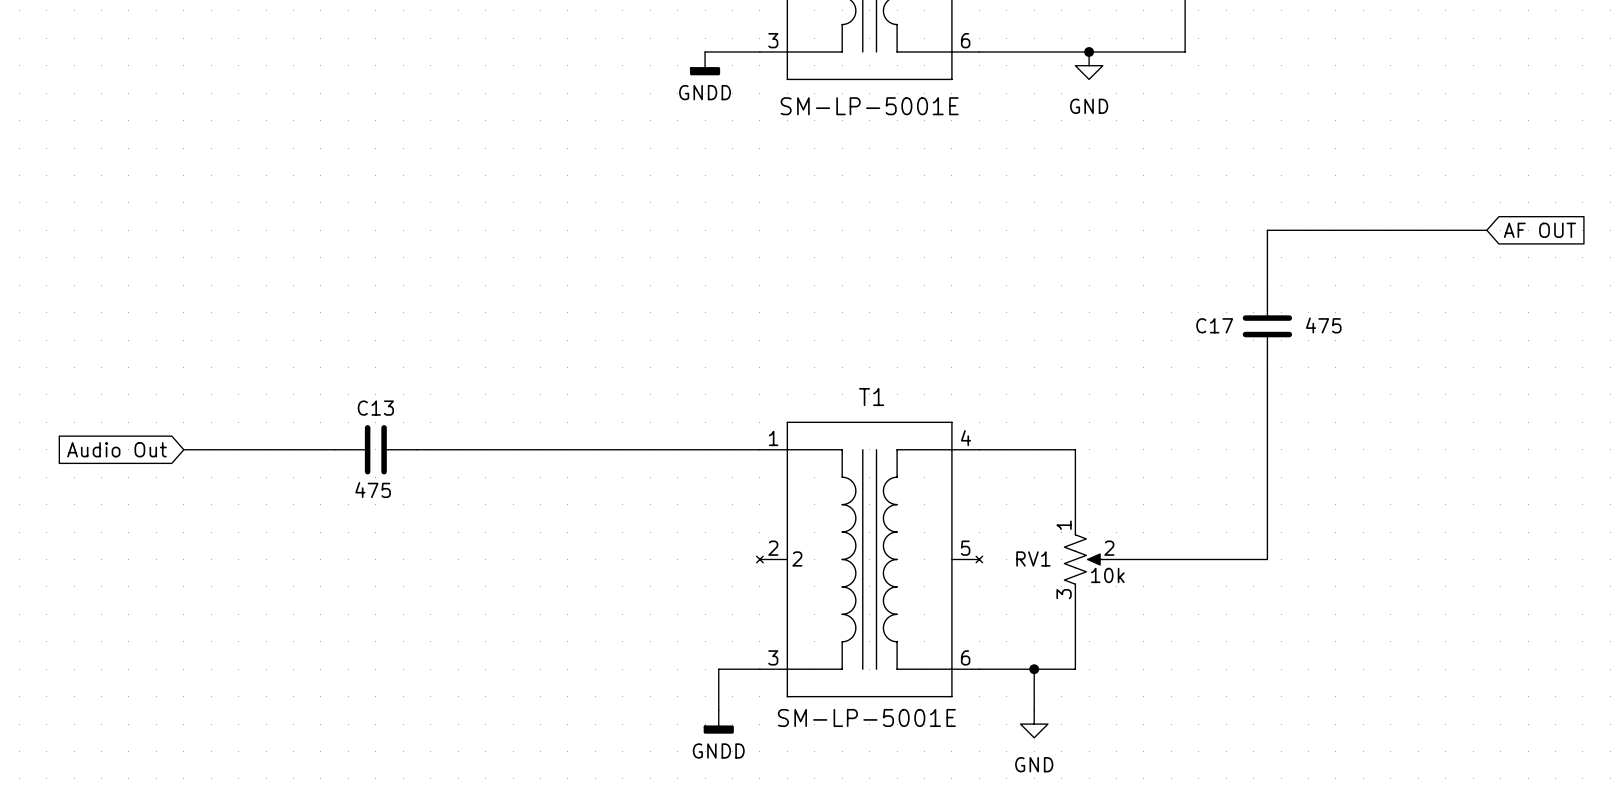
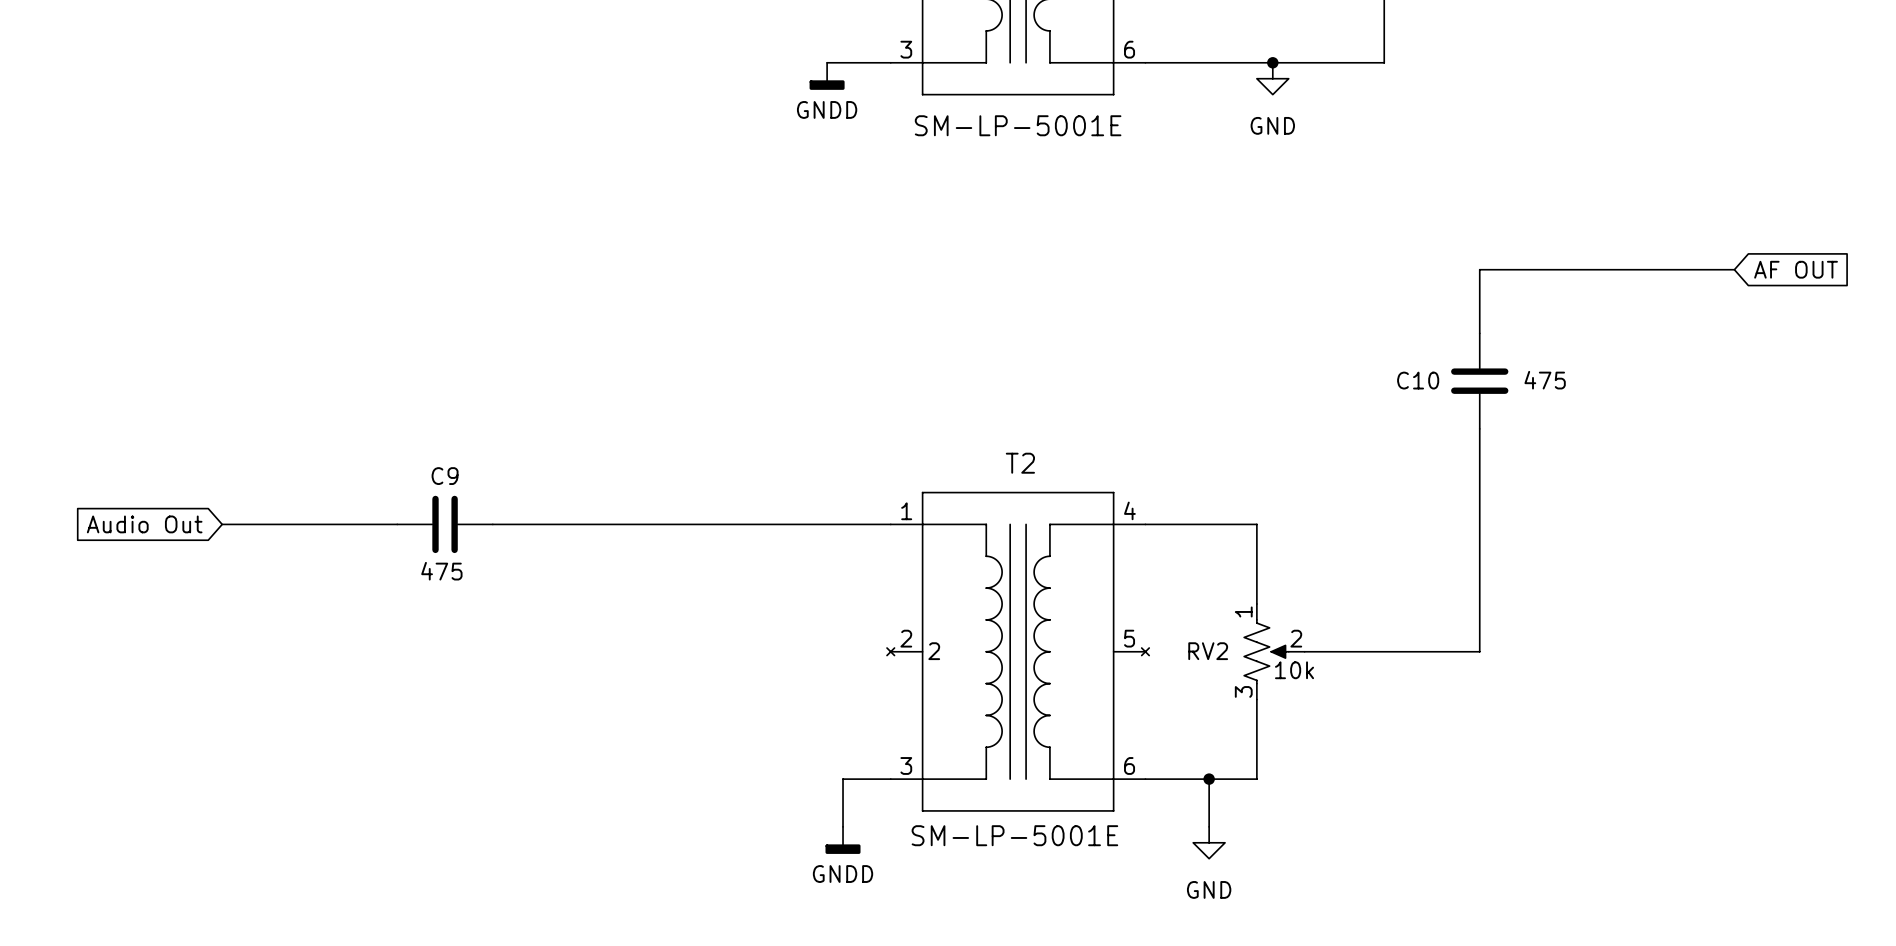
C17 name: C17 (1214, 325) -> C10 (1418, 380)
T1 name: T1 (871, 397) -> T2 (1020, 463)
C13 name: C13 (375, 408) -> C9 (445, 476)
RV1 name: RV1 (1033, 558) -> RV2 (1208, 651)

